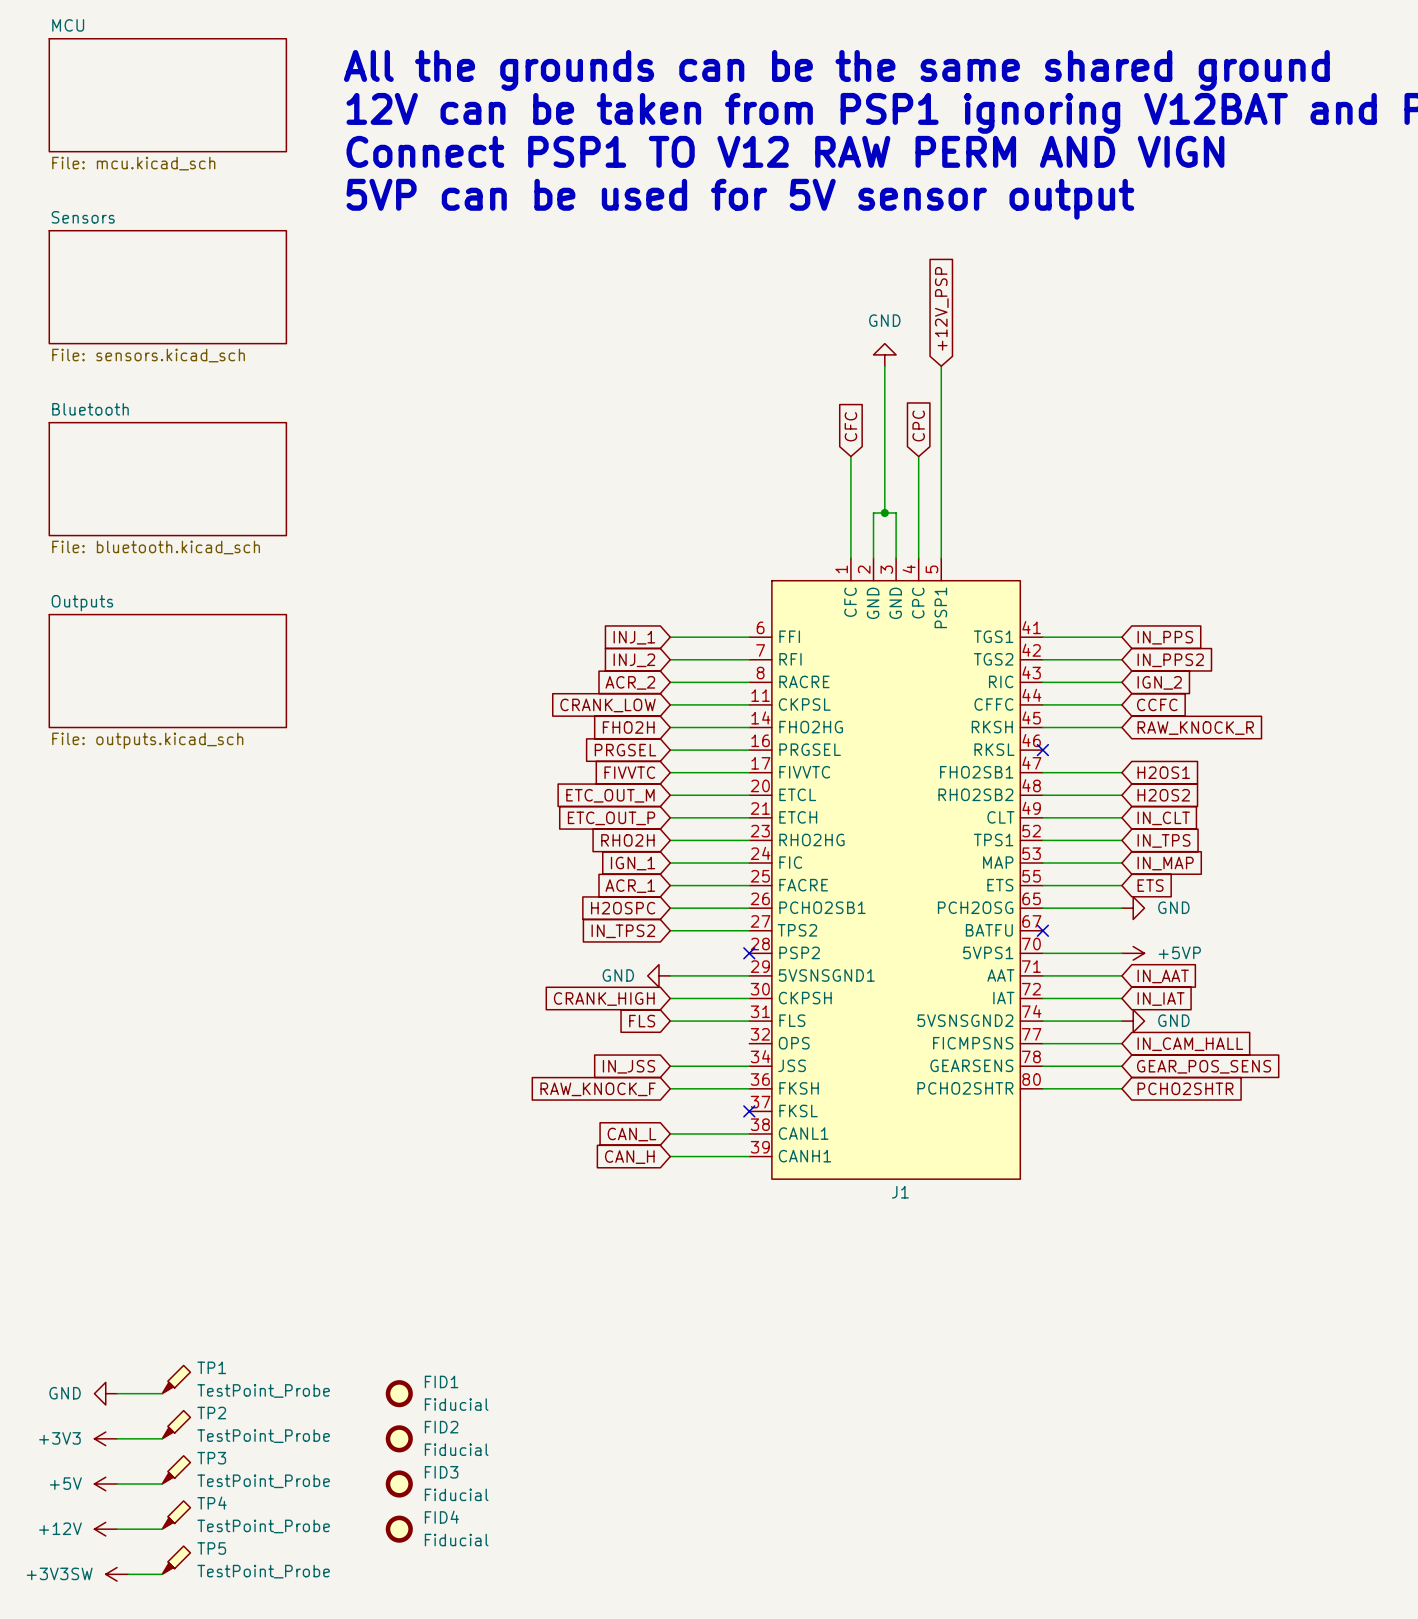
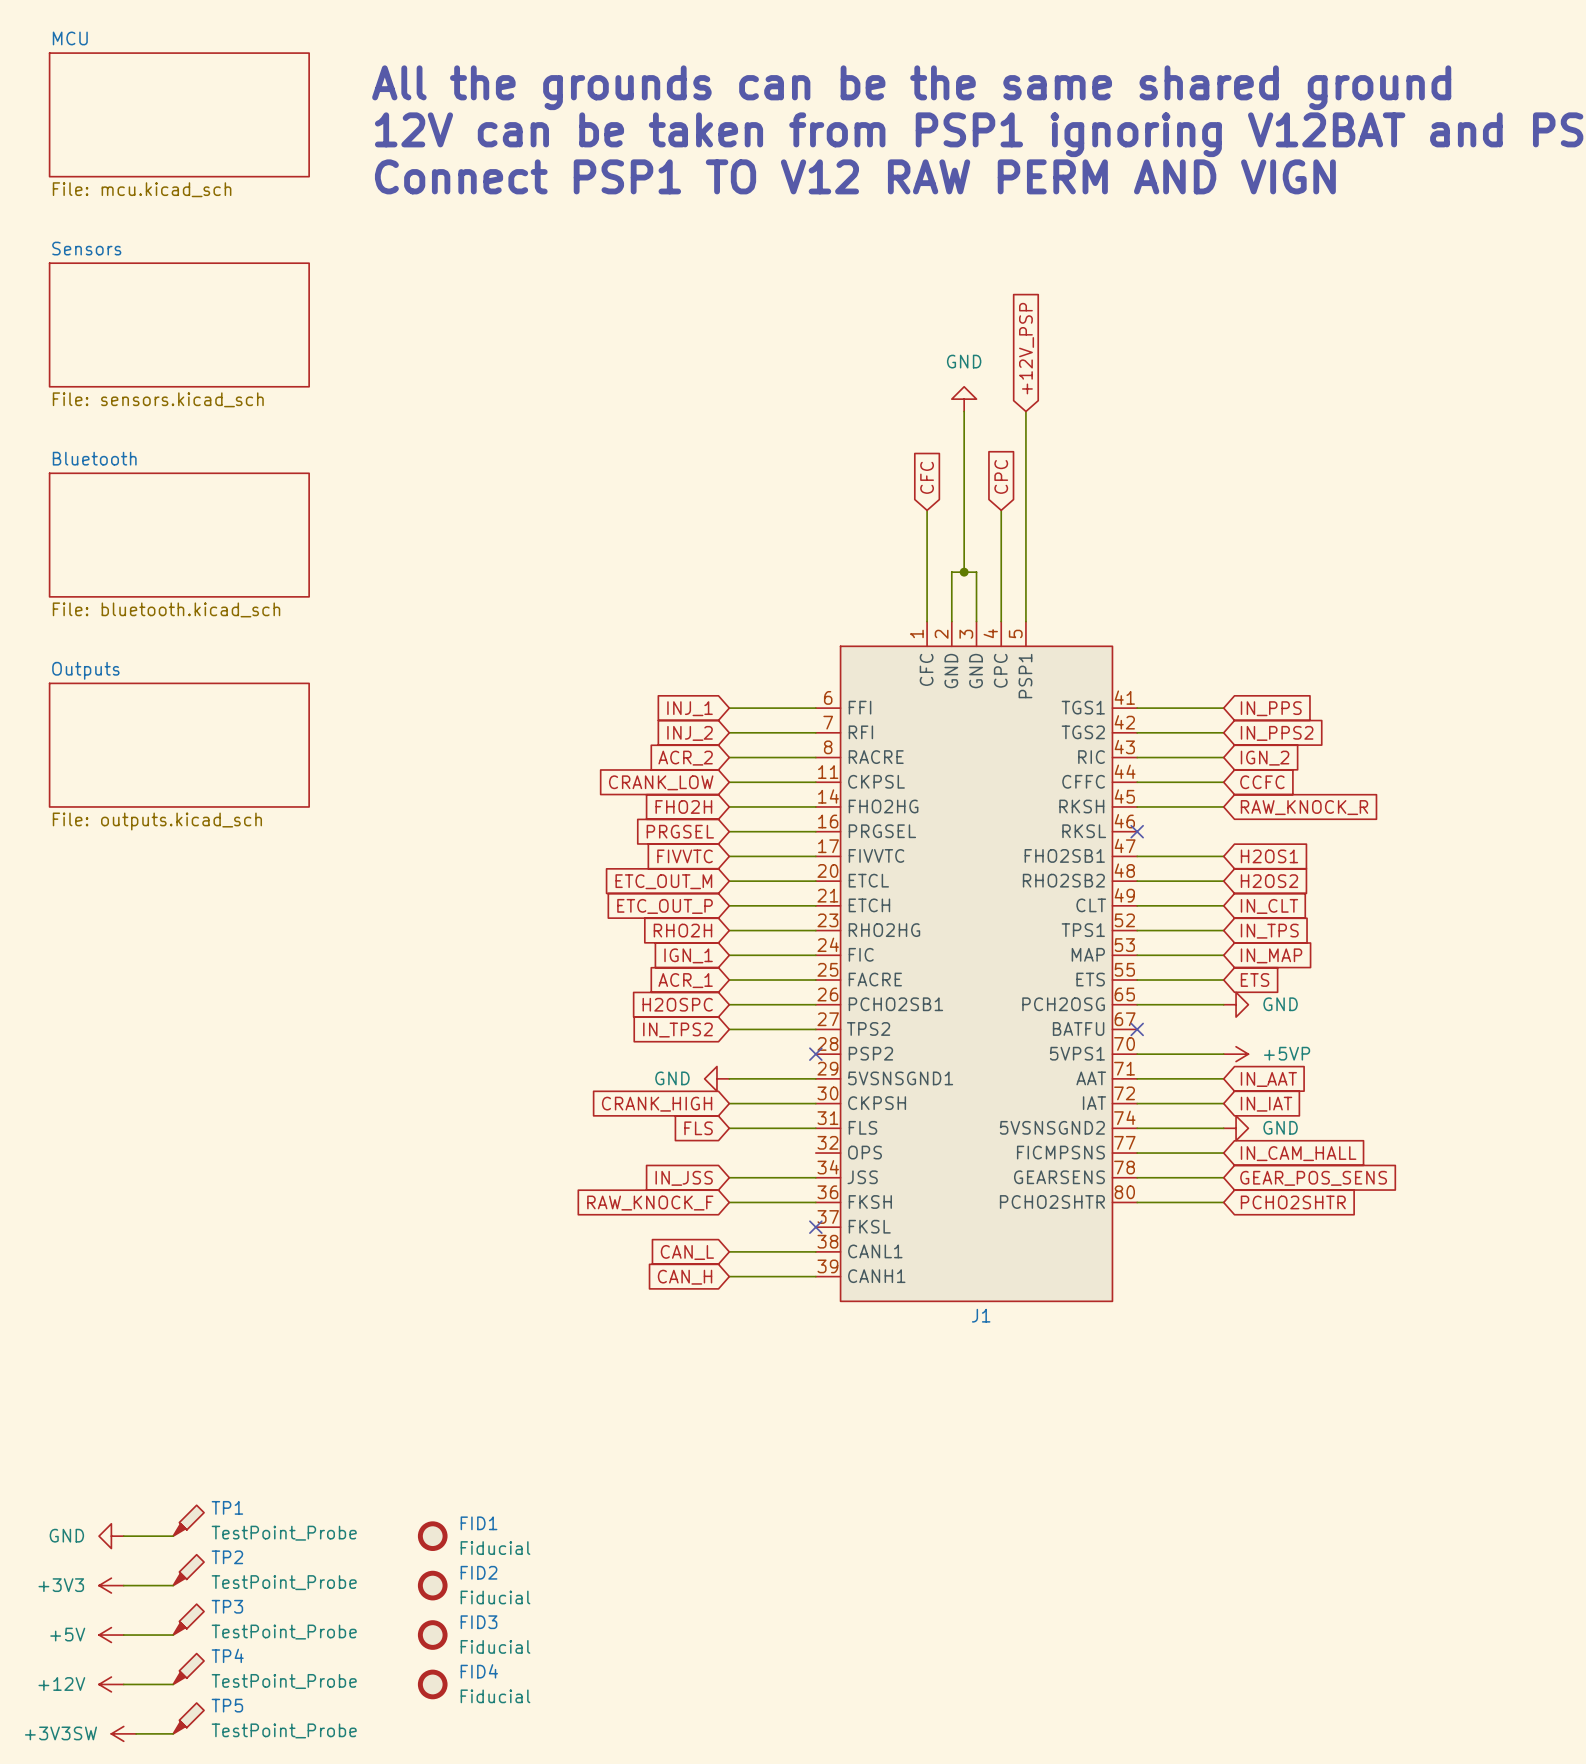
text: 5VP can be used for 5V sensor output (740, 199) -> none

